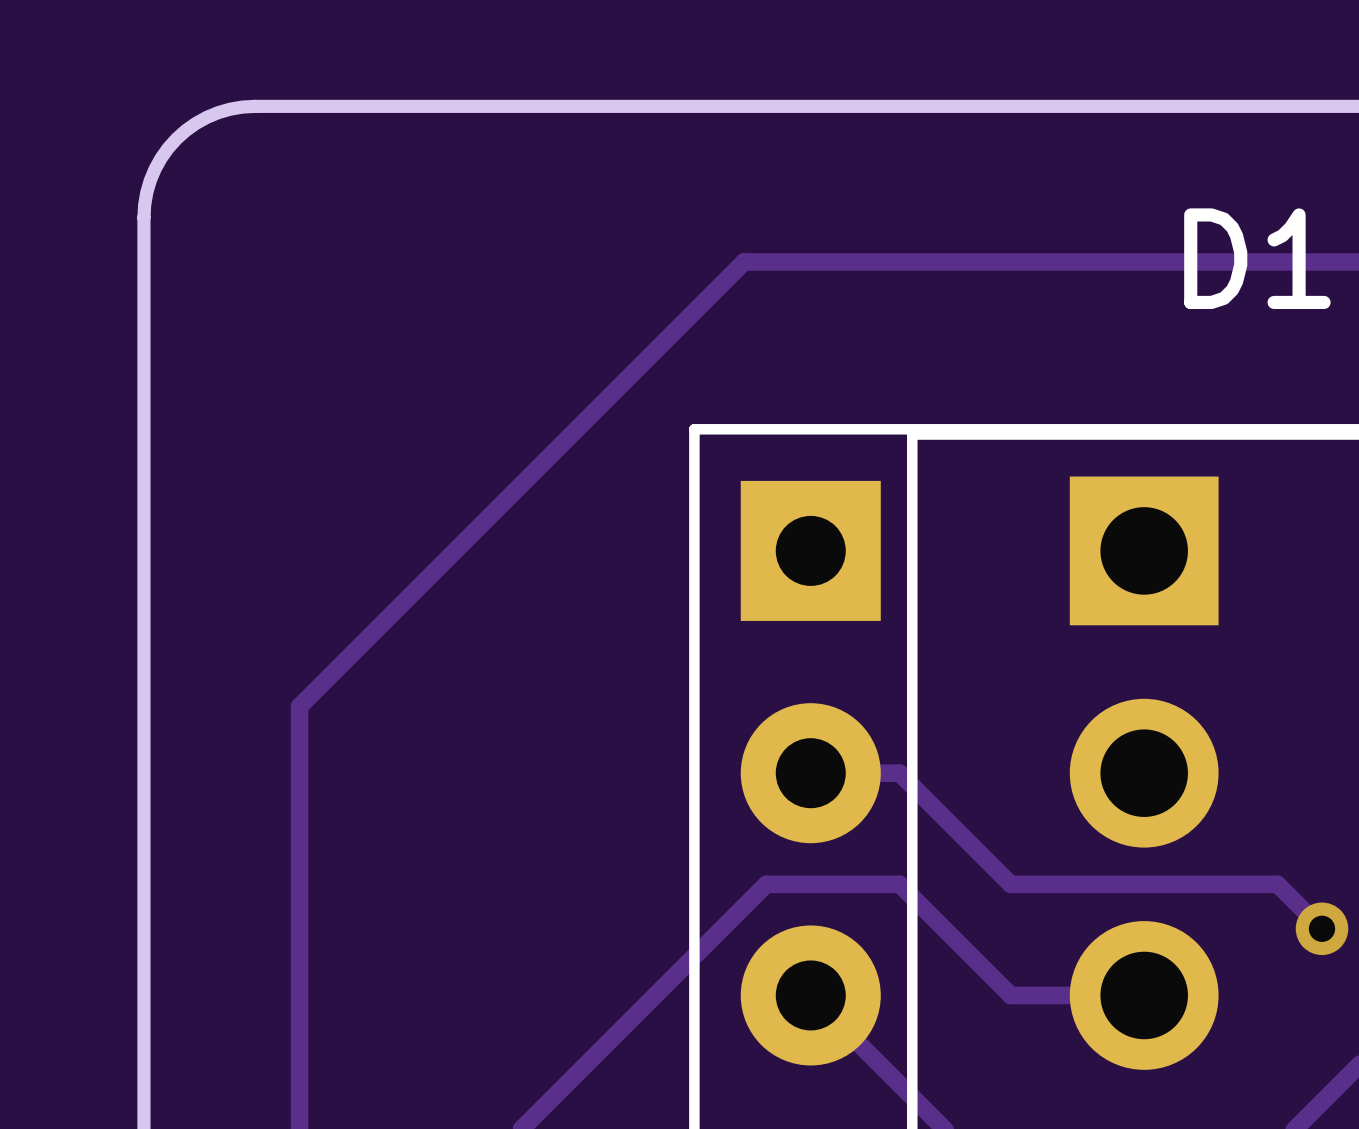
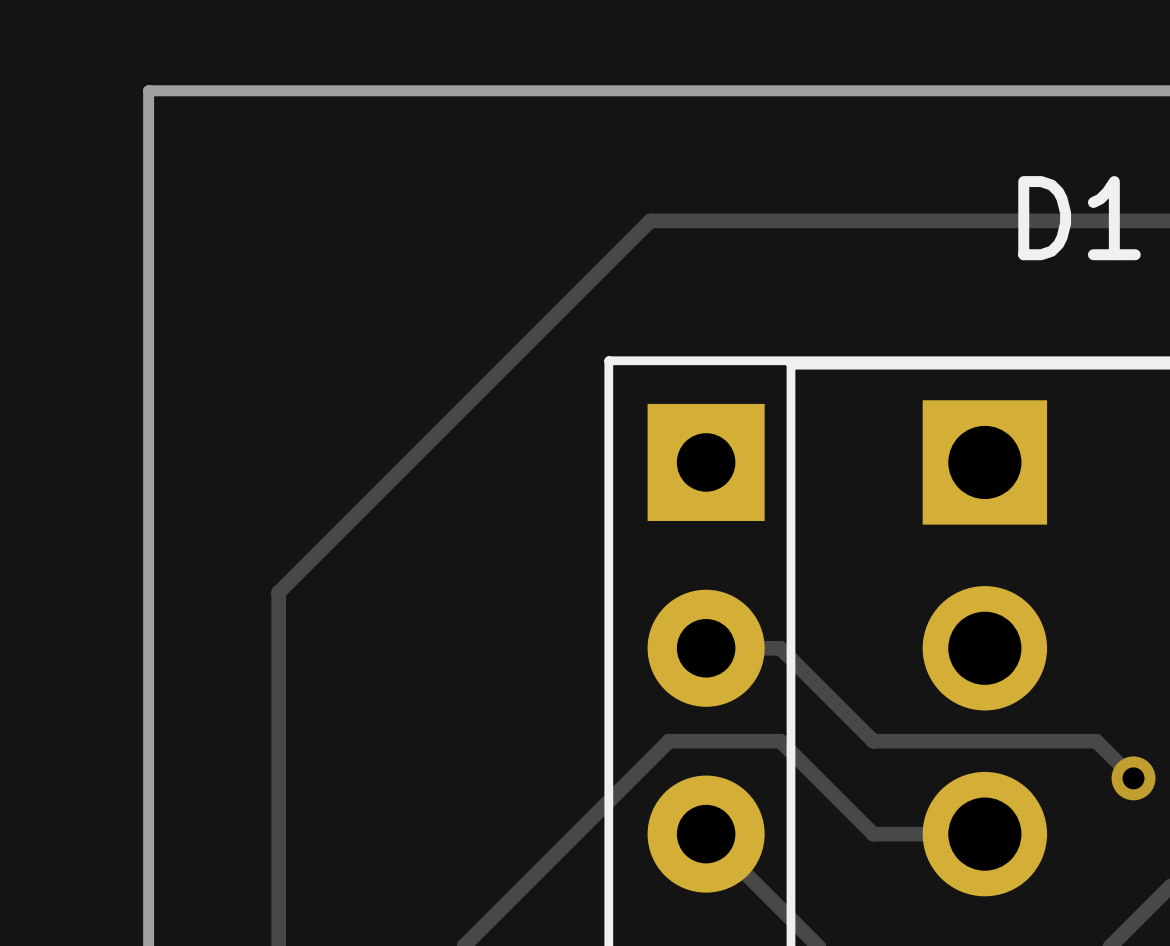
board edge: (255, 106) (218, 112) (195, 123) (176, 138) (154, 169) (146, 192) (143, 217) -> (241, 90) (148, 90) (148, 183)

